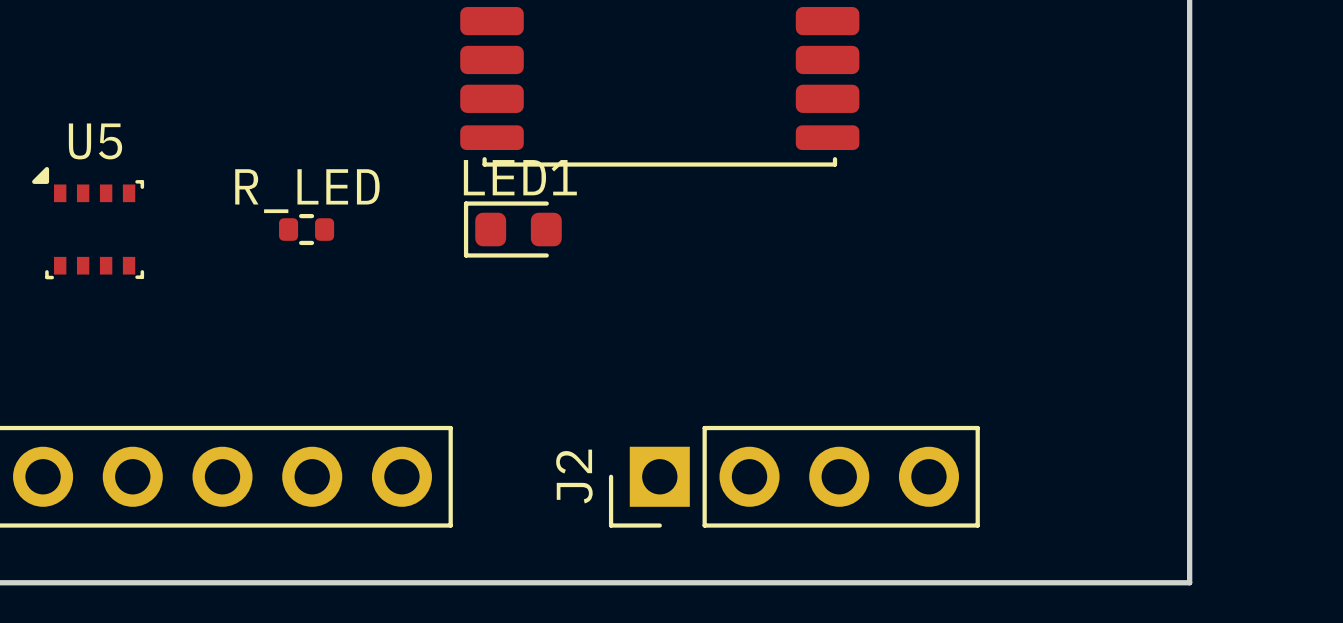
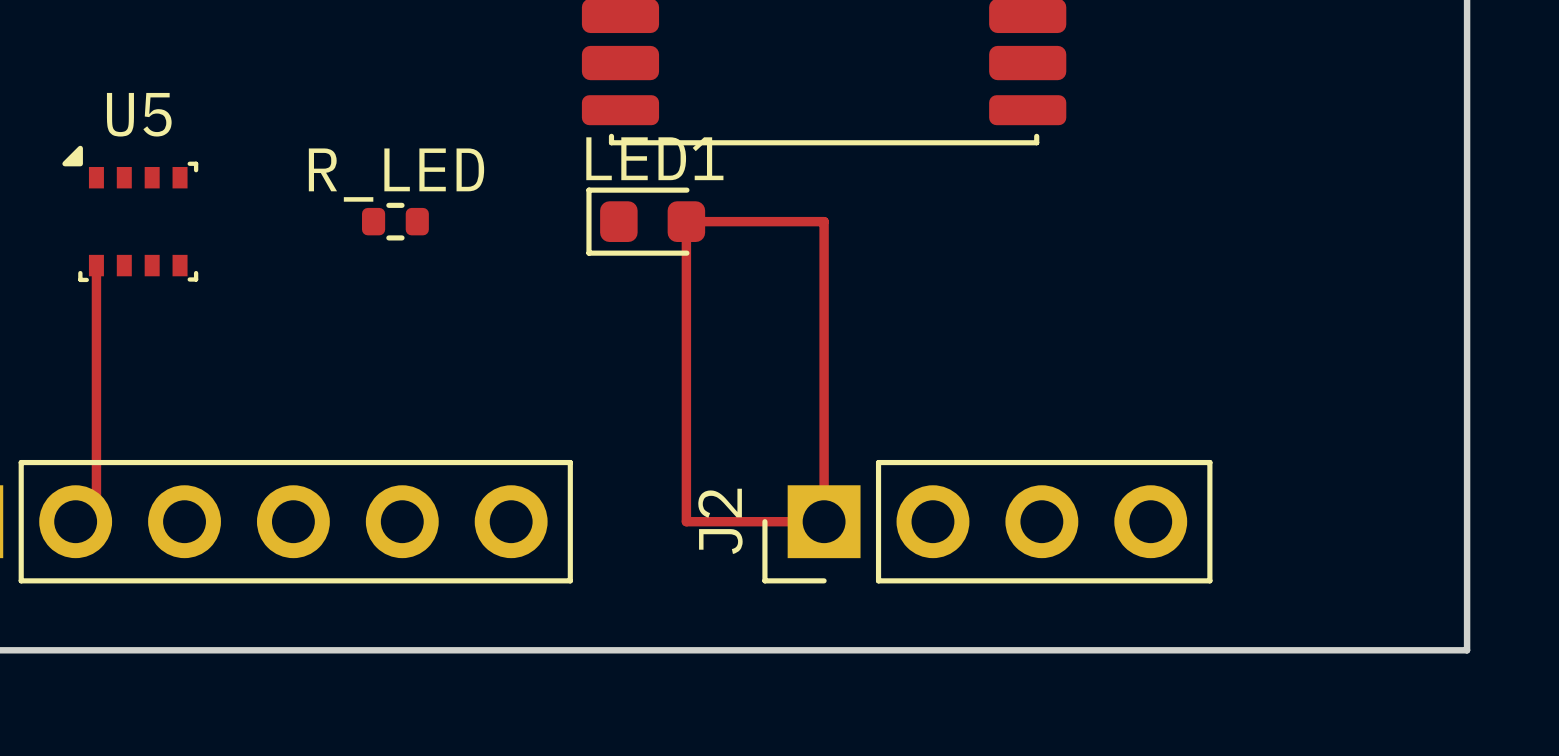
track: none -> (686, 221) (686, 521) (824, 521) (824, 221) (686, 221)
track: none -> (96, 265) (96, 521) (75, 521)

